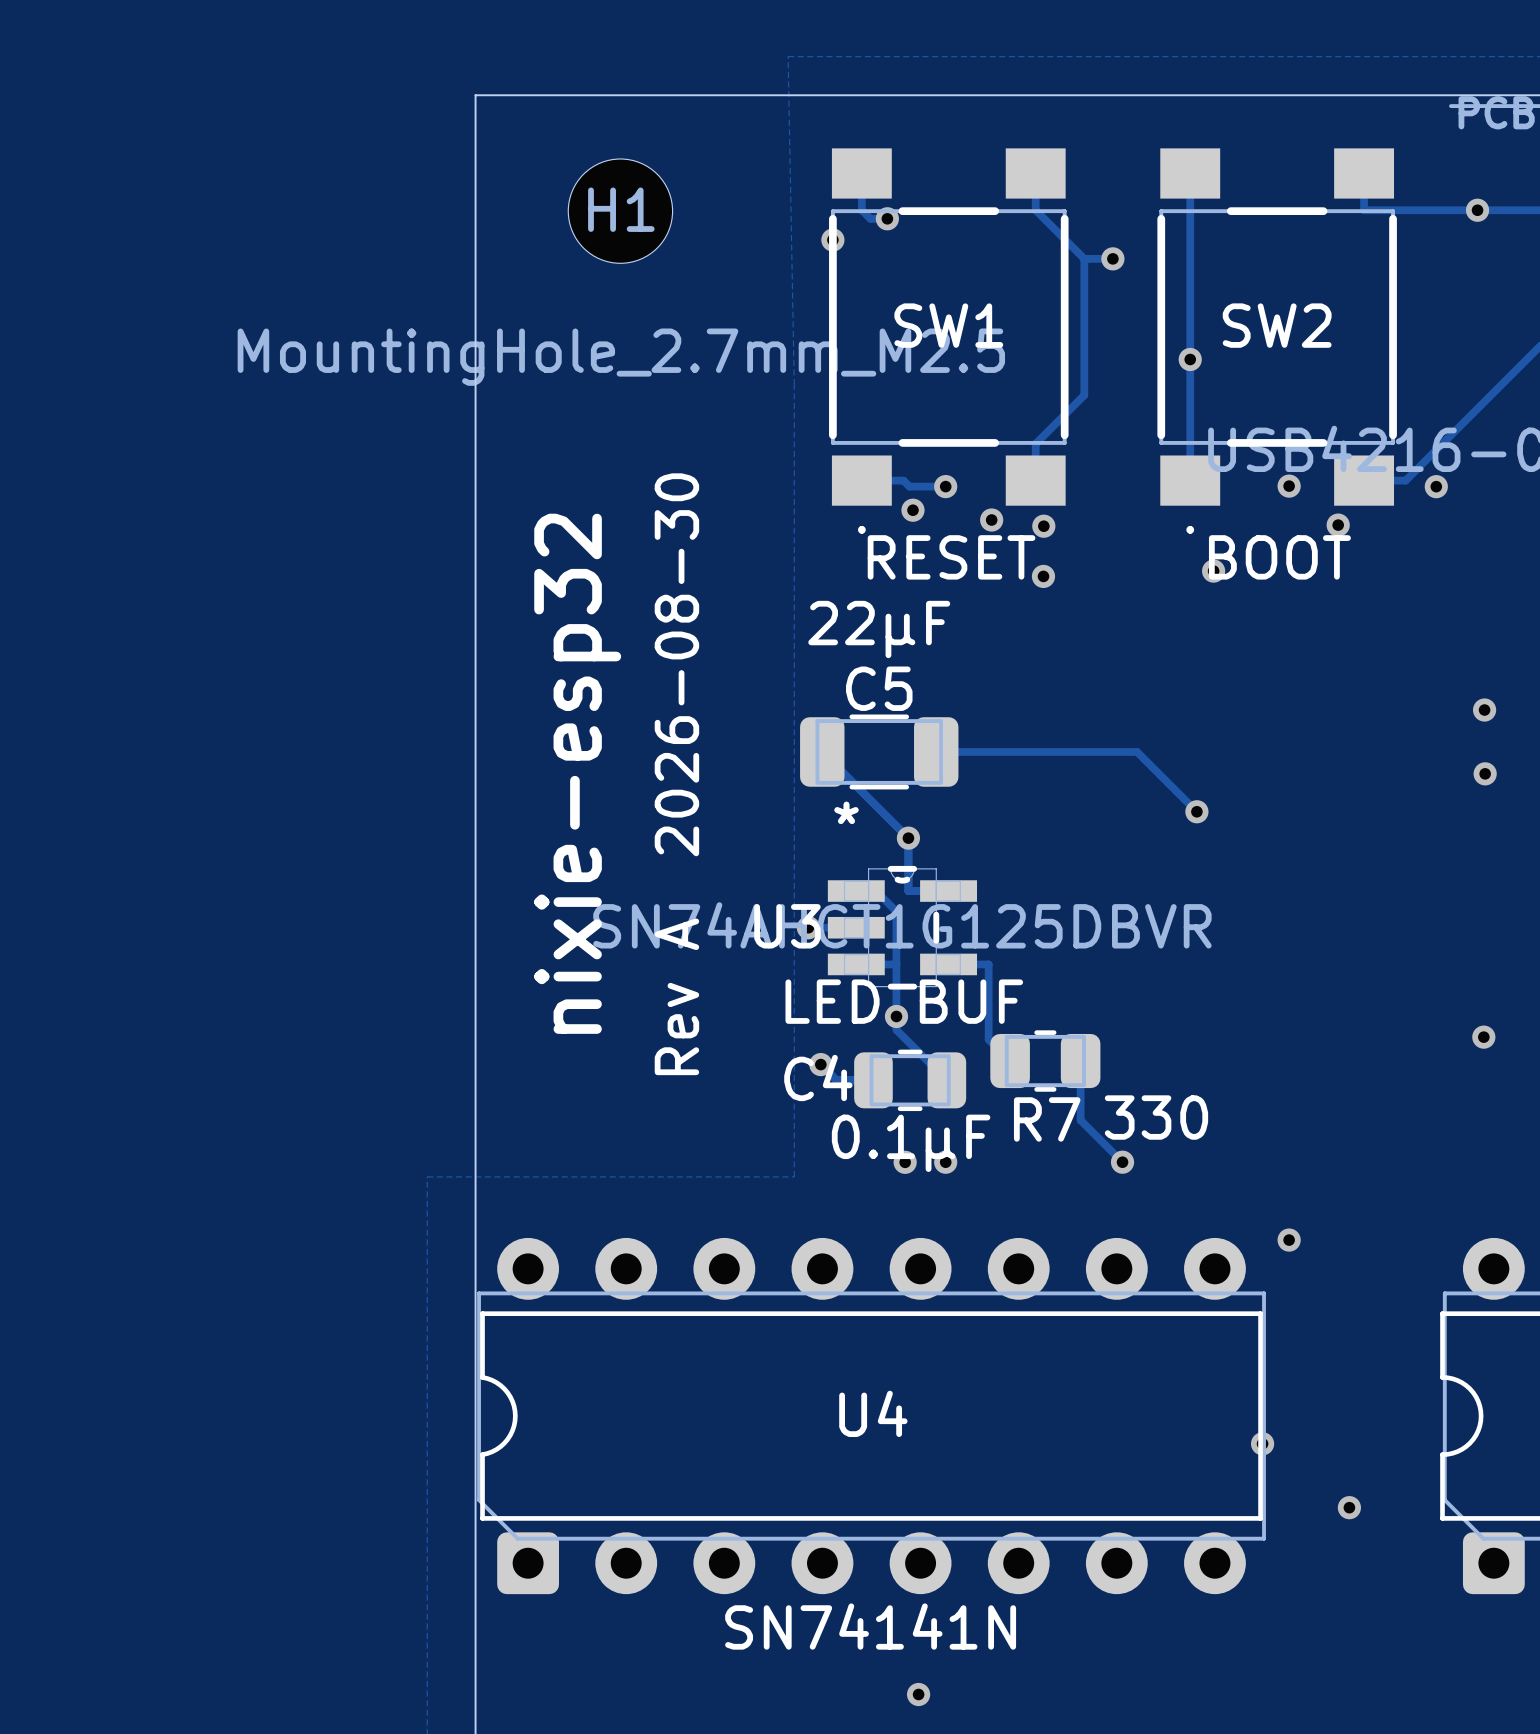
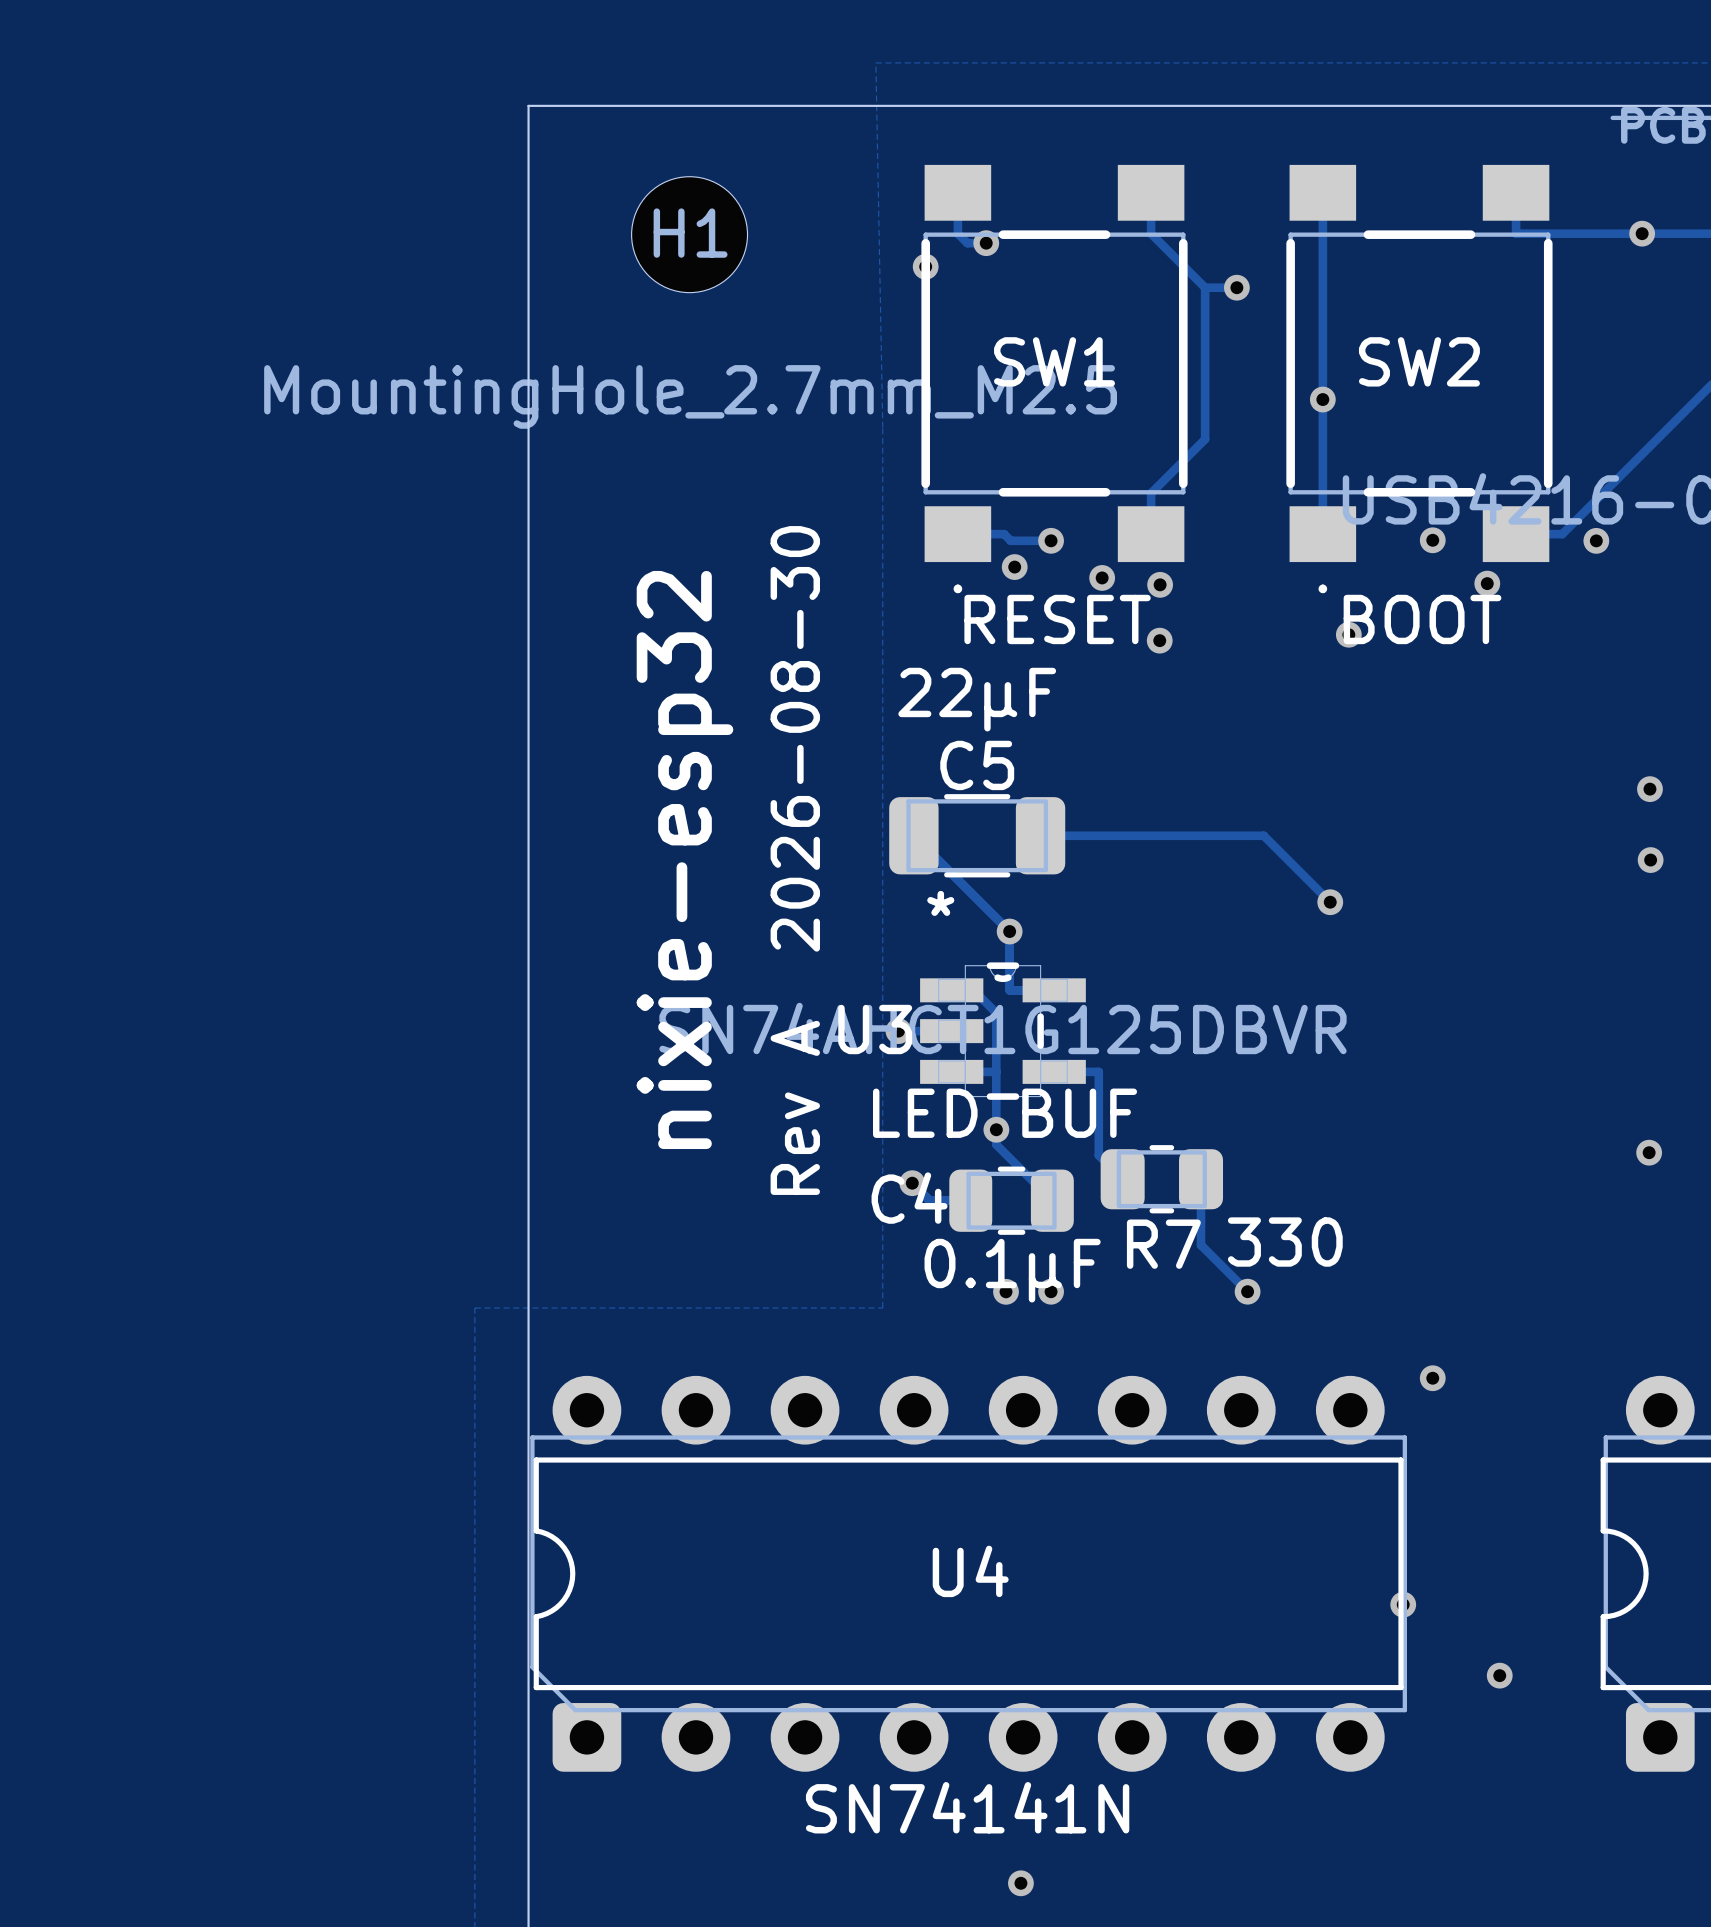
text position: nixie-esp32 (577, 773) -> nixie-esp32 (685, 859)
text position: Rev A 2026-08-30 (676, 774) -> Rev A 2026-08-30 (795, 860)

